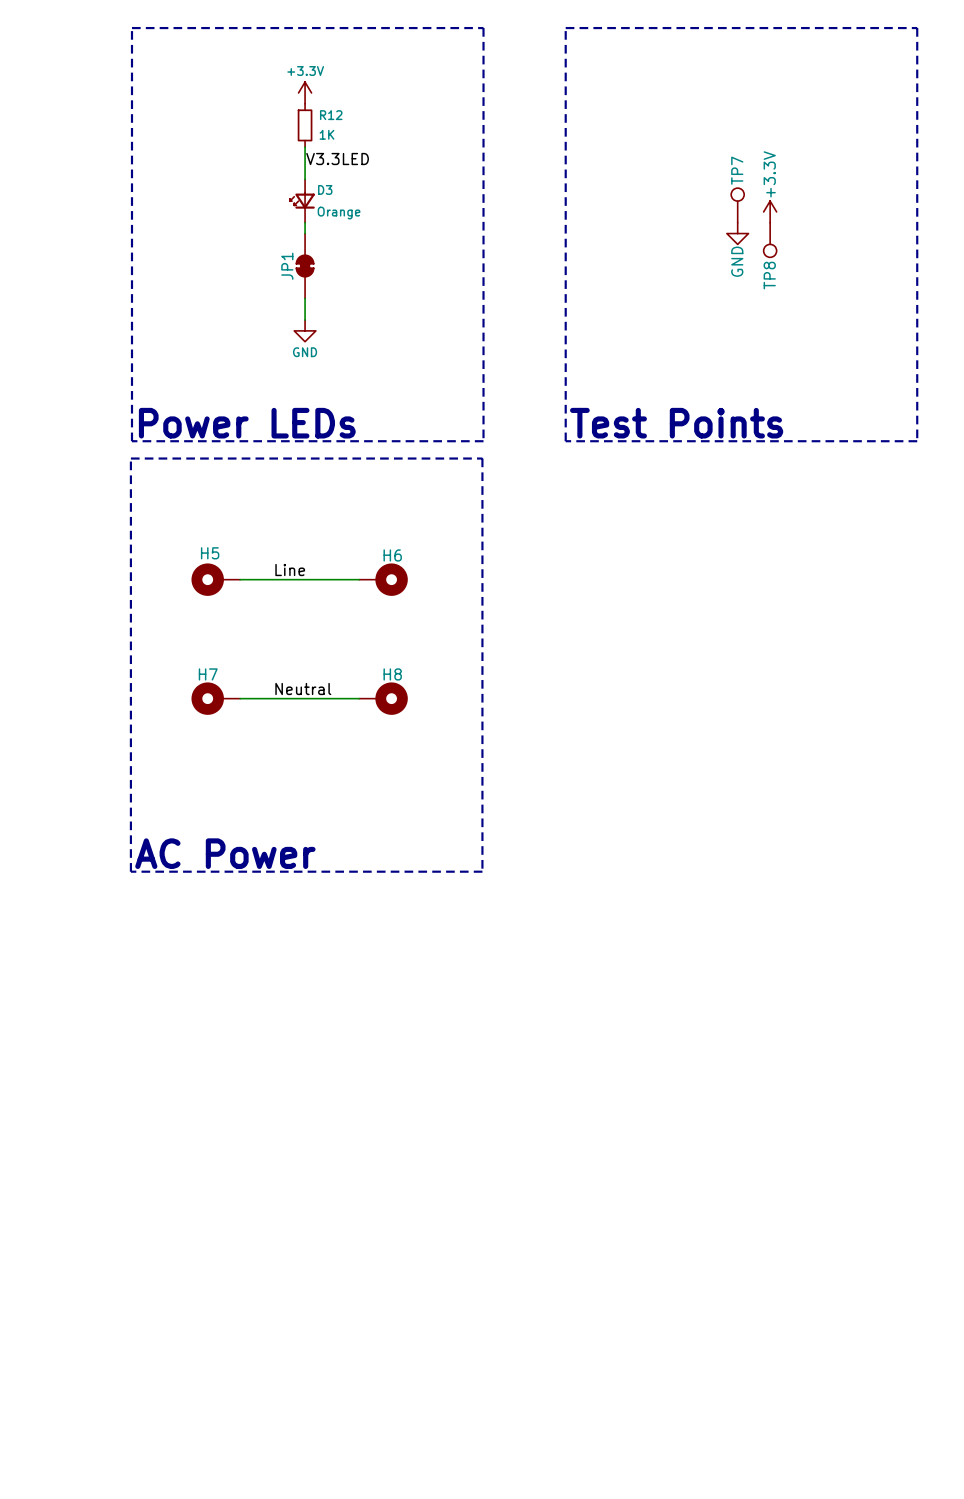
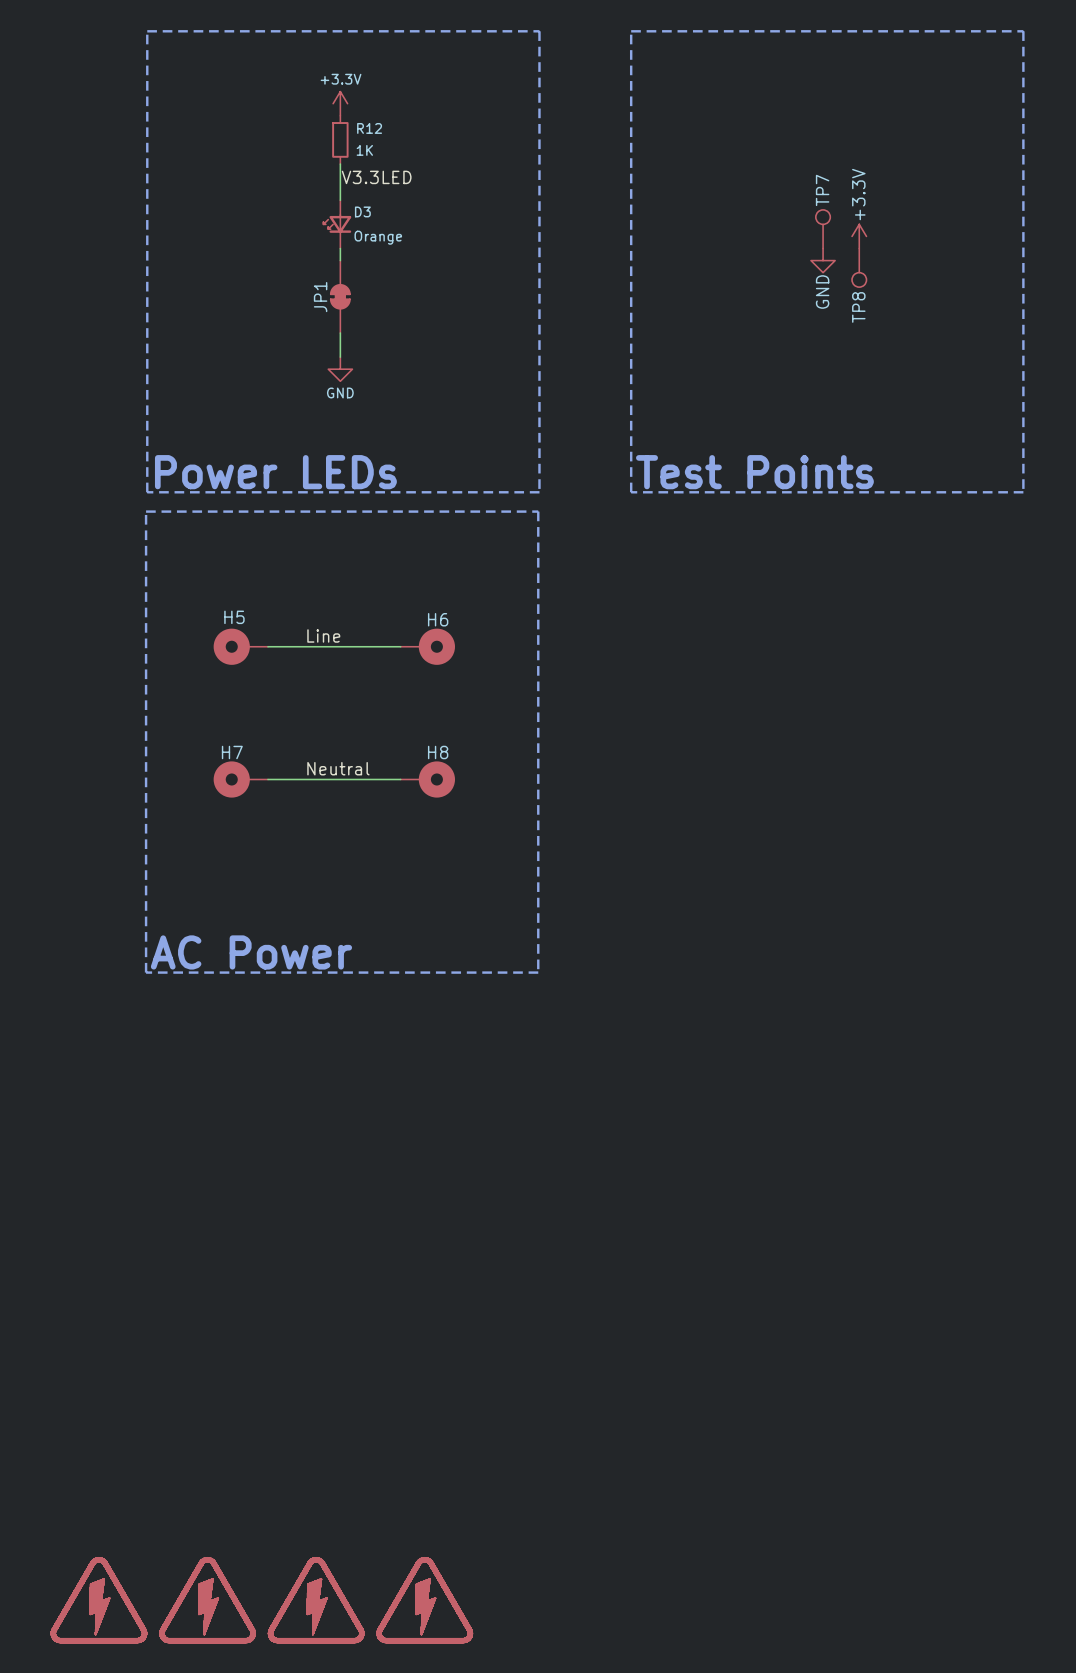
part: none -> (98, 1600)
part: none -> (207, 1600)
part: none -> (316, 1600)
part: none -> (424, 1600)

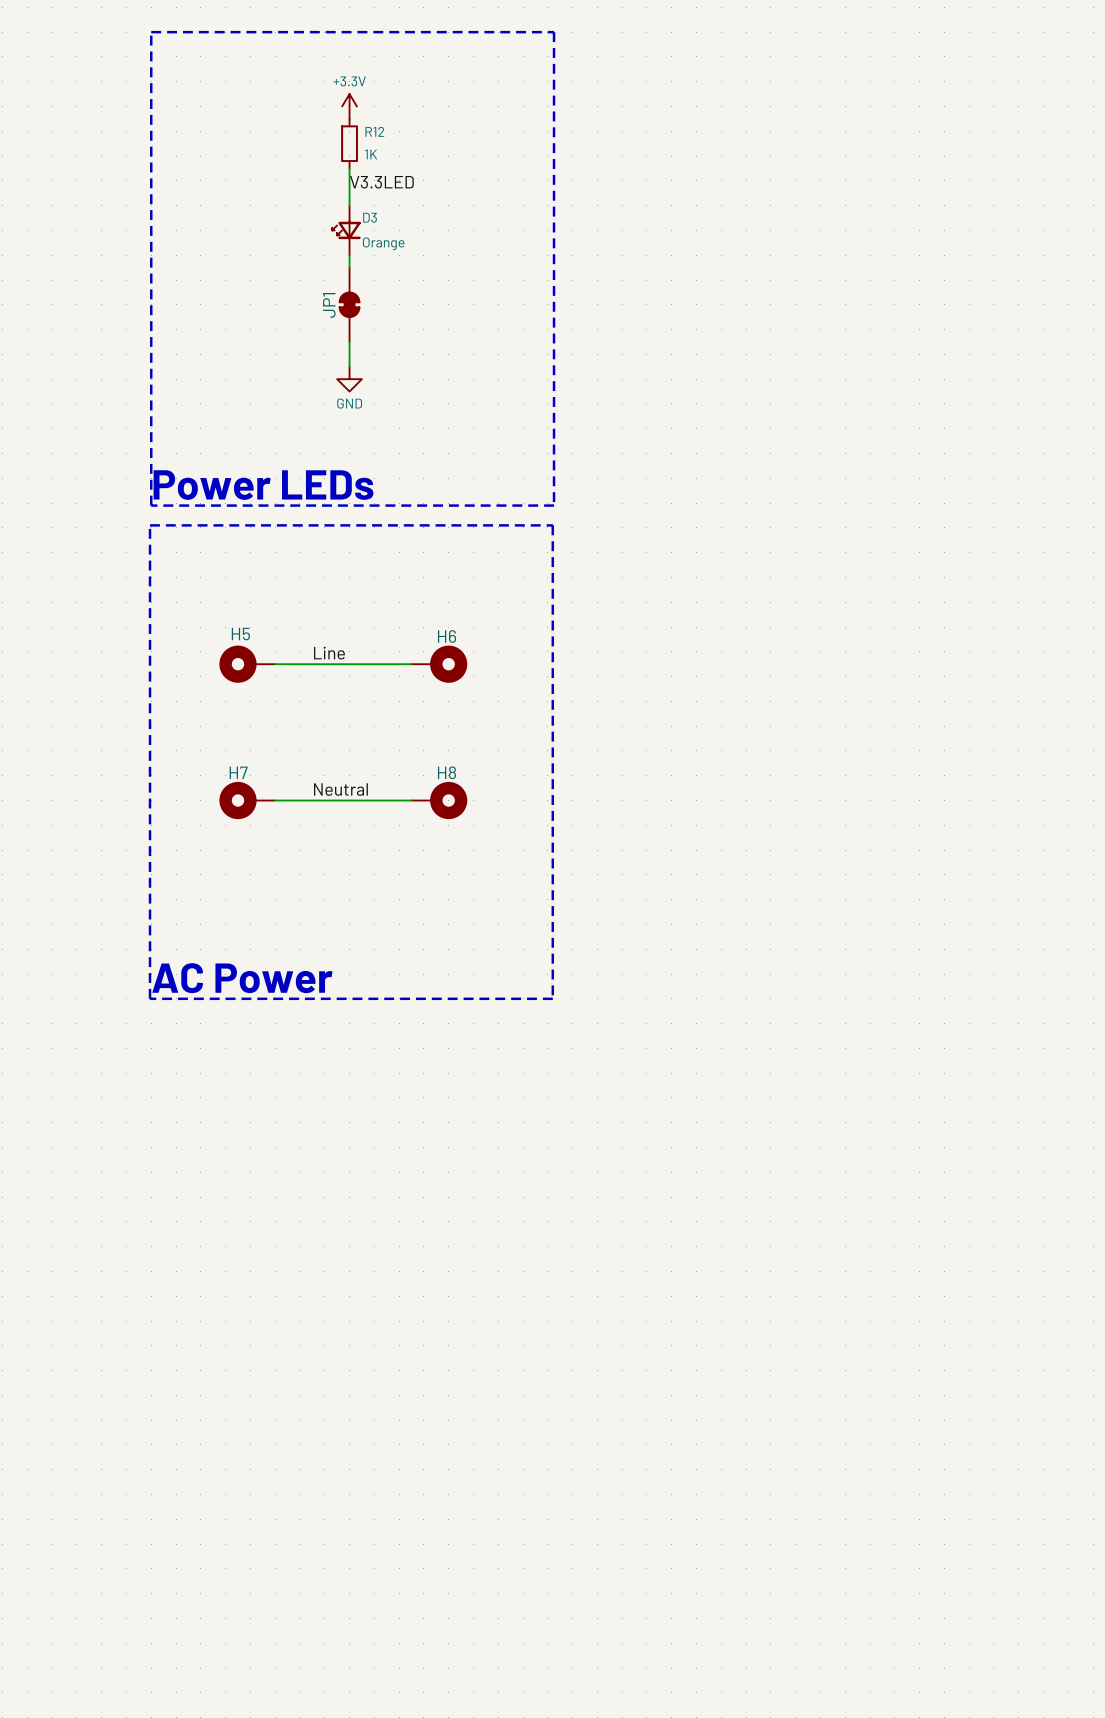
line: (631, 31) (1023, 31) (1023, 492) (631, 492) (631, 31) -> none
TP7: (823, 229) -> none
power symbol: +3.3V (859, 236) -> none
power symbol: GND (823, 260) -> none
TP8: (859, 267) -> none
text: Test Points (754, 472) -> none
part: (98, 1600) -> none
part: (207, 1600) -> none
part: (316, 1600) -> none
part: (424, 1600) -> none

